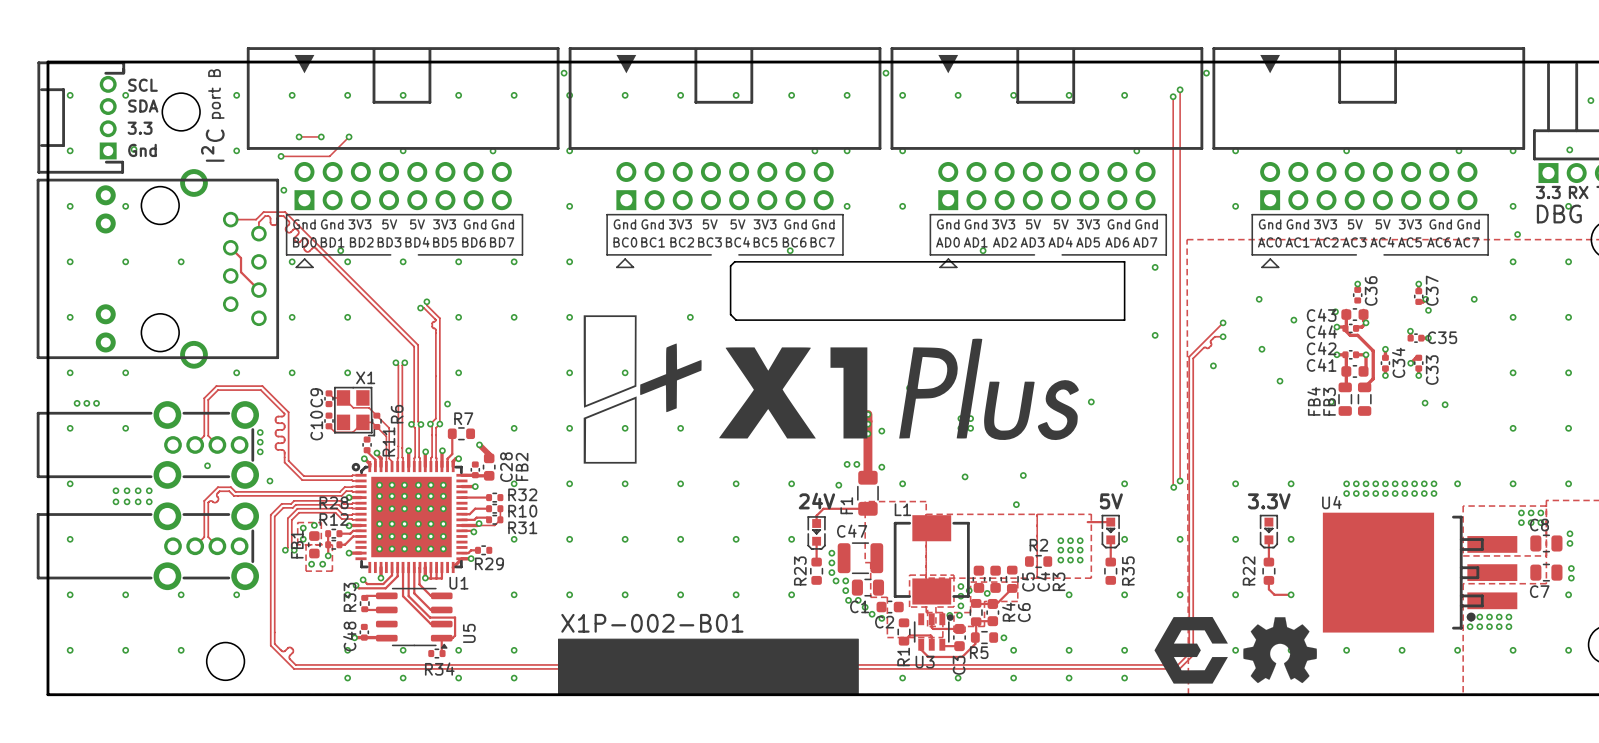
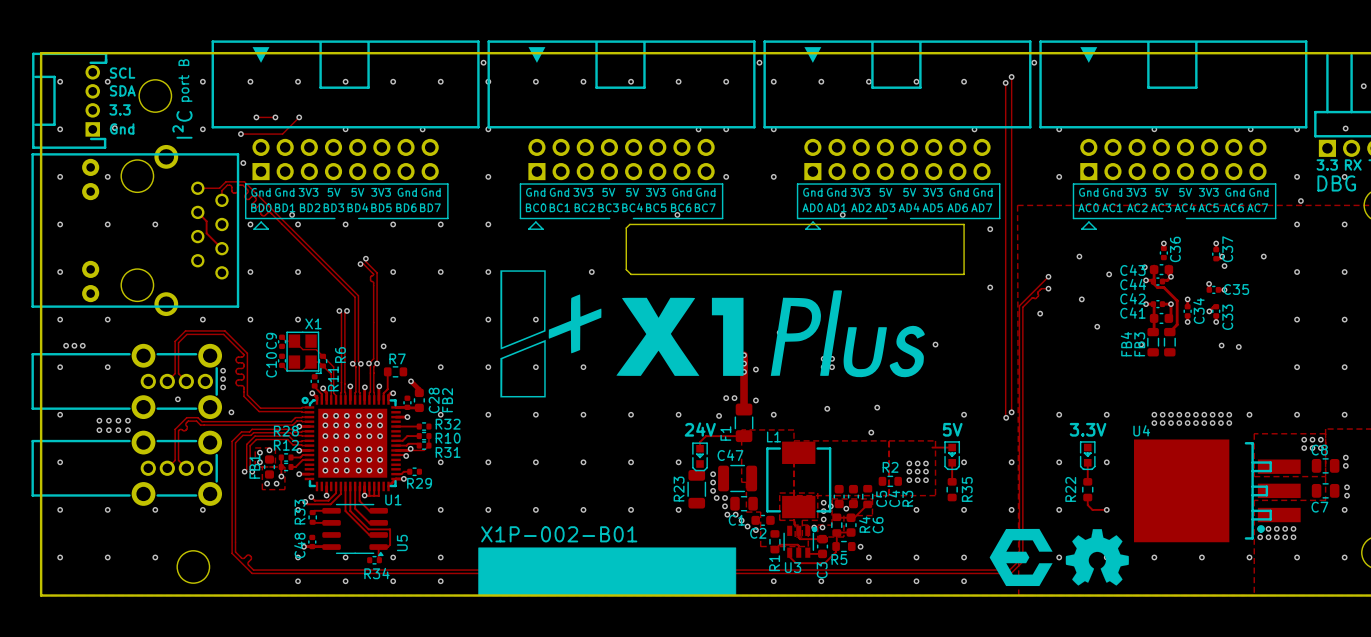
track: (816, 541) (816, 562) -> none
R23 footprint: [810, 557, 824, 585] -> [687, 470, 706, 509]

